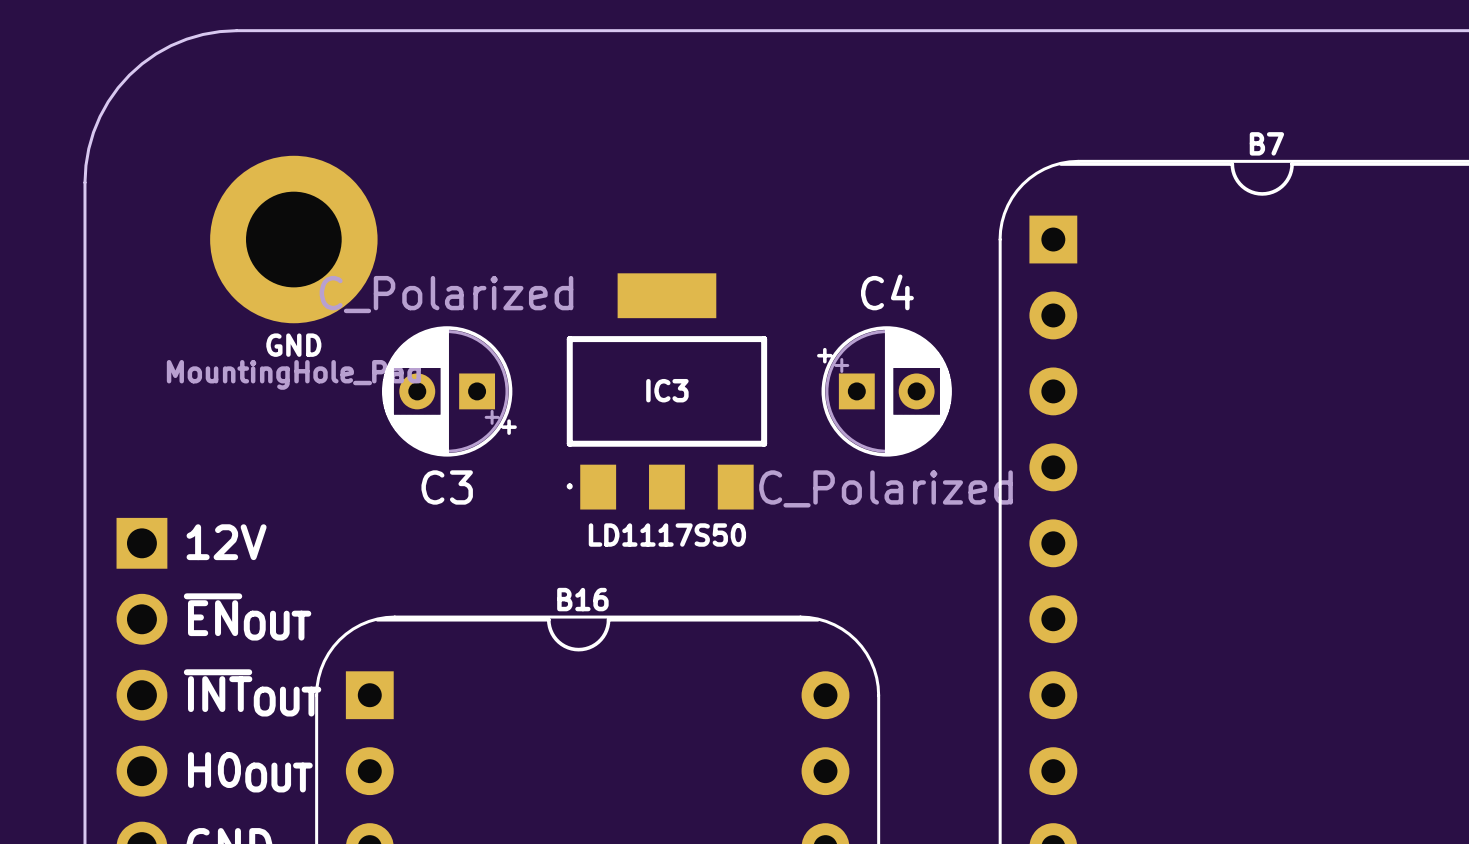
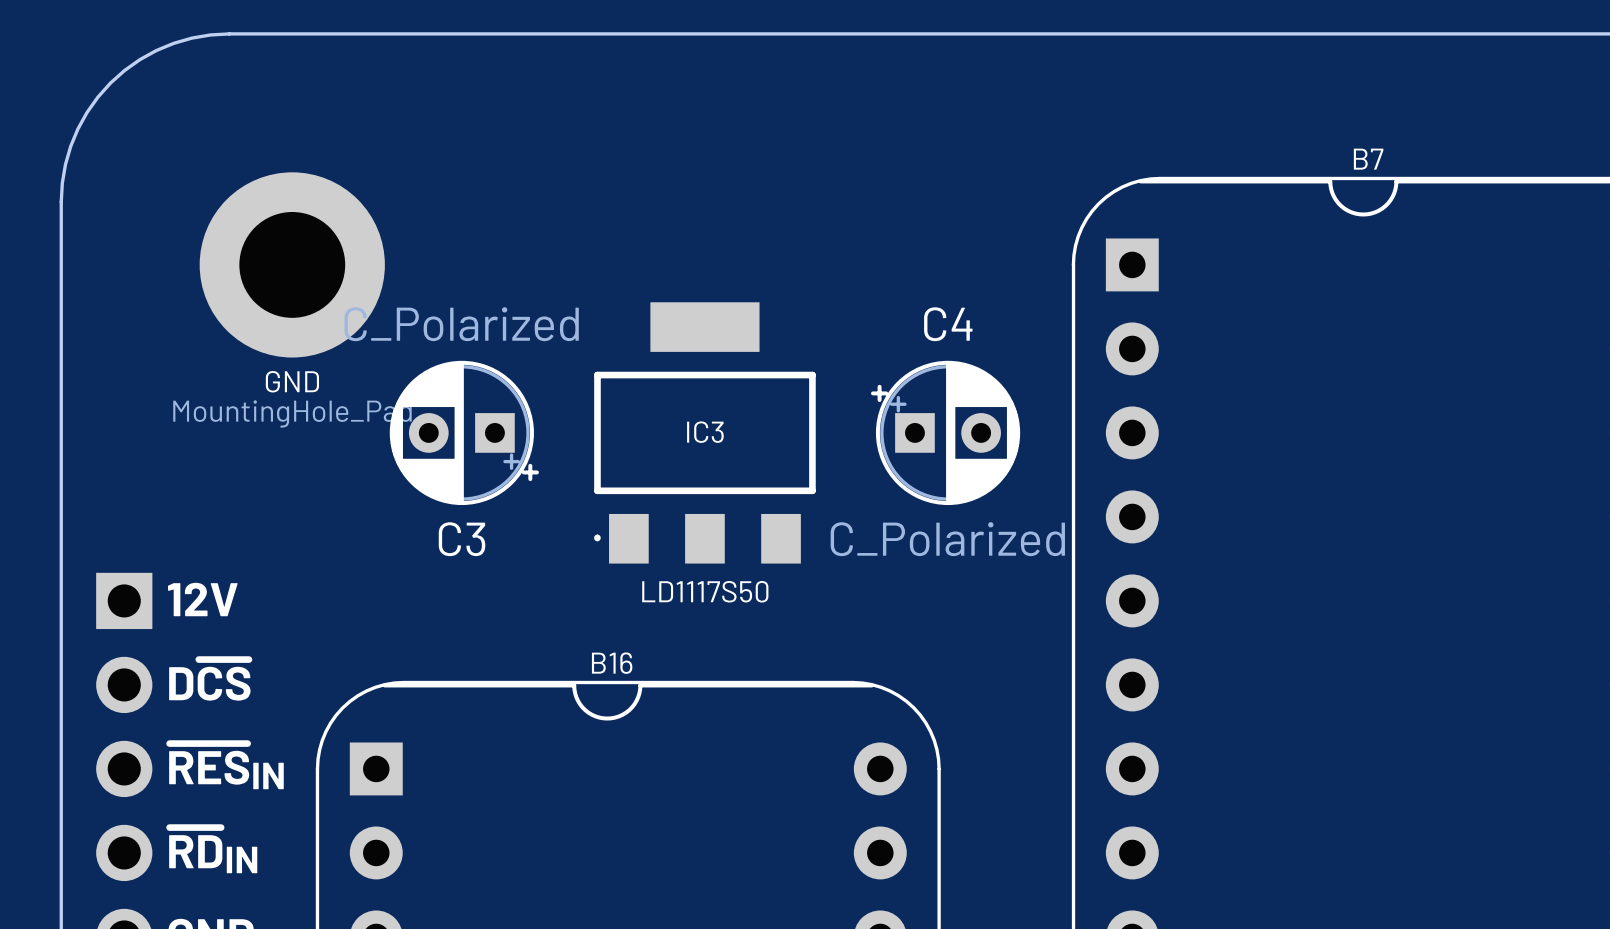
text: ~{EN}OUT (247, 616) -> D~{CS} (209, 680)
text: ~{INT}OUT (252, 692) -> ~{RES}IN (226, 766)
text: H0OUT (250, 772) -> ~{RD}IN (213, 850)

